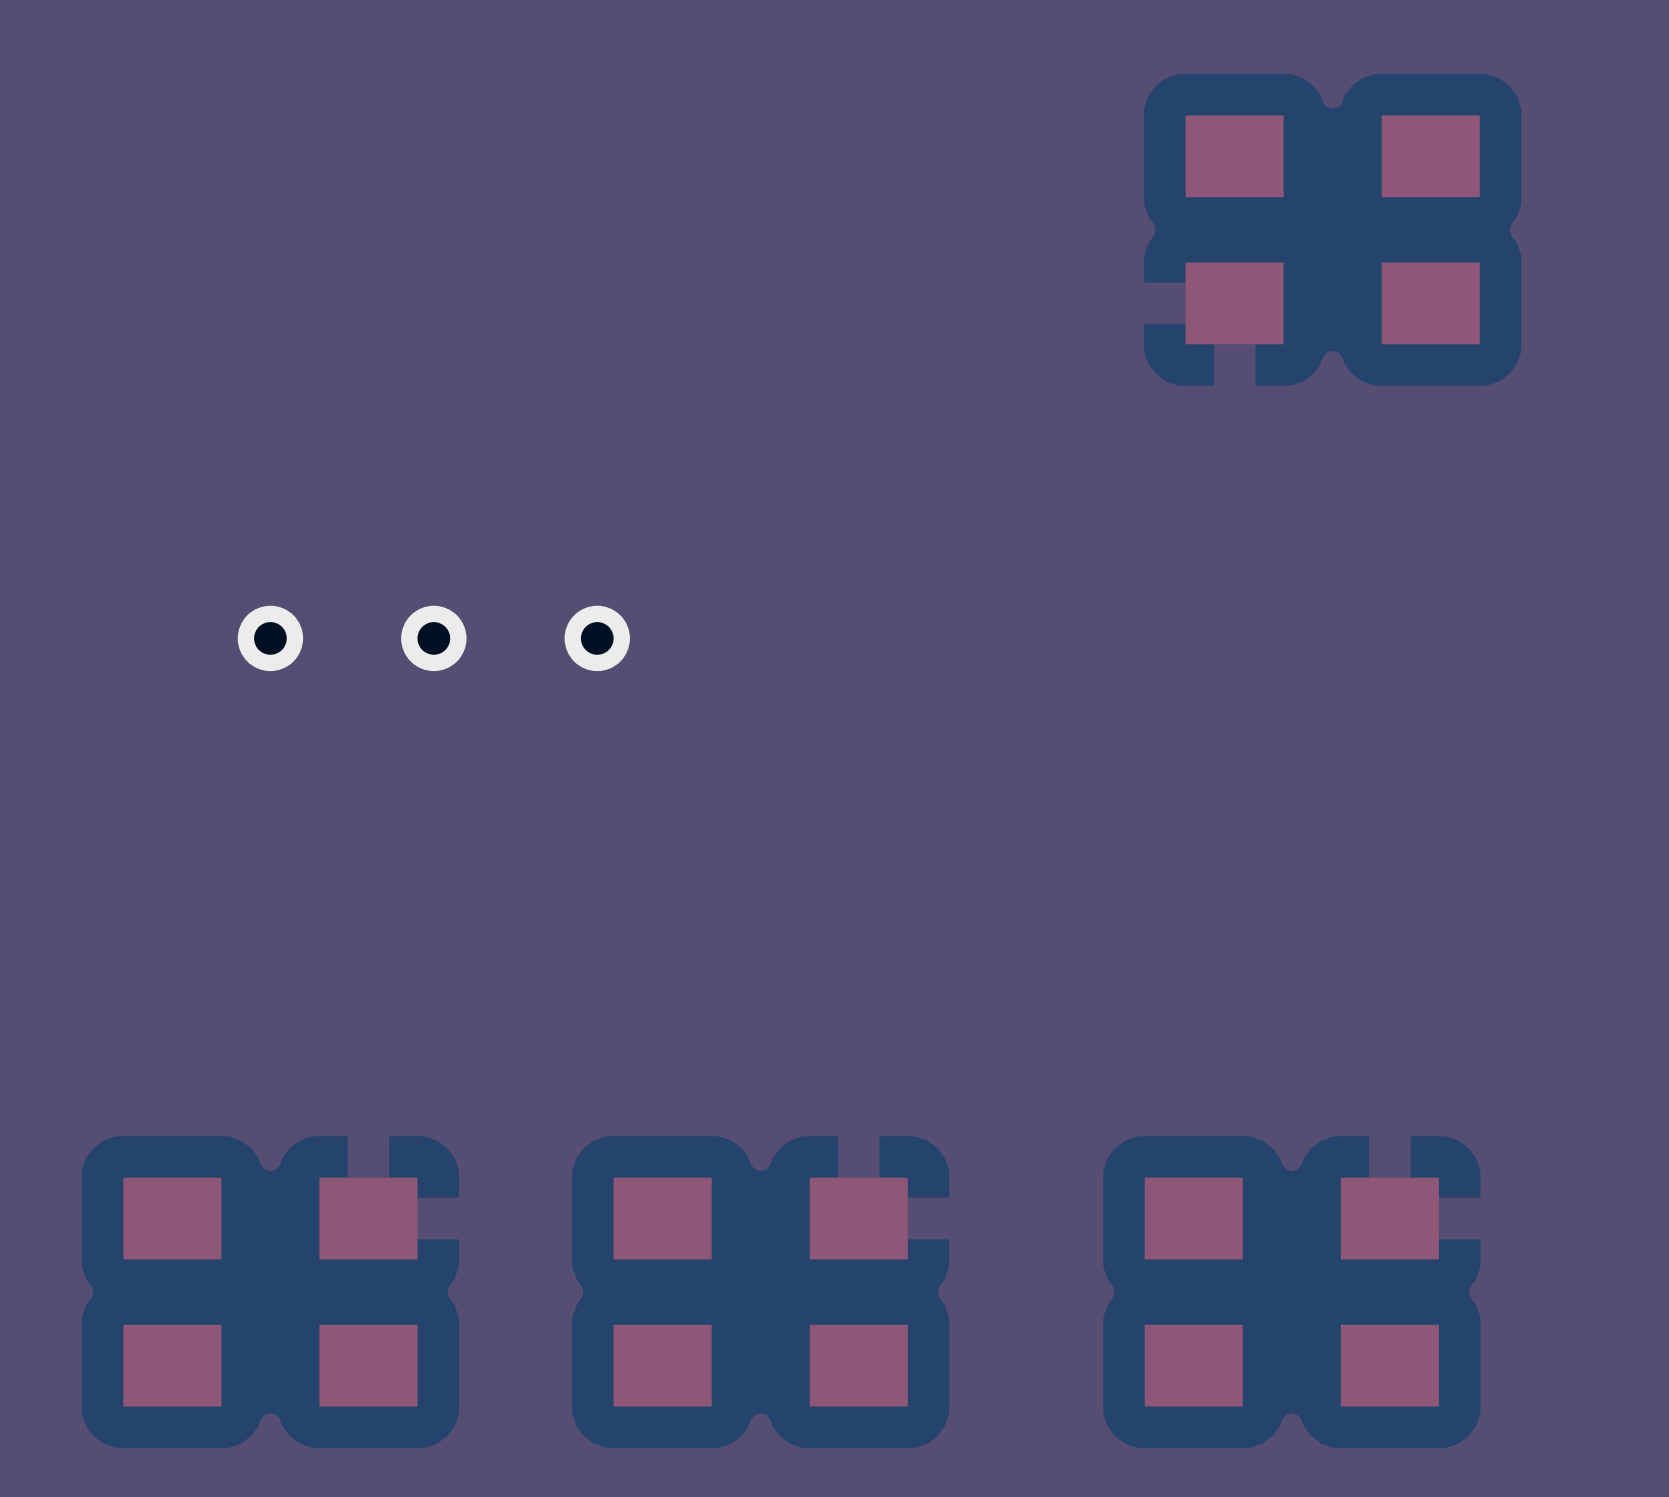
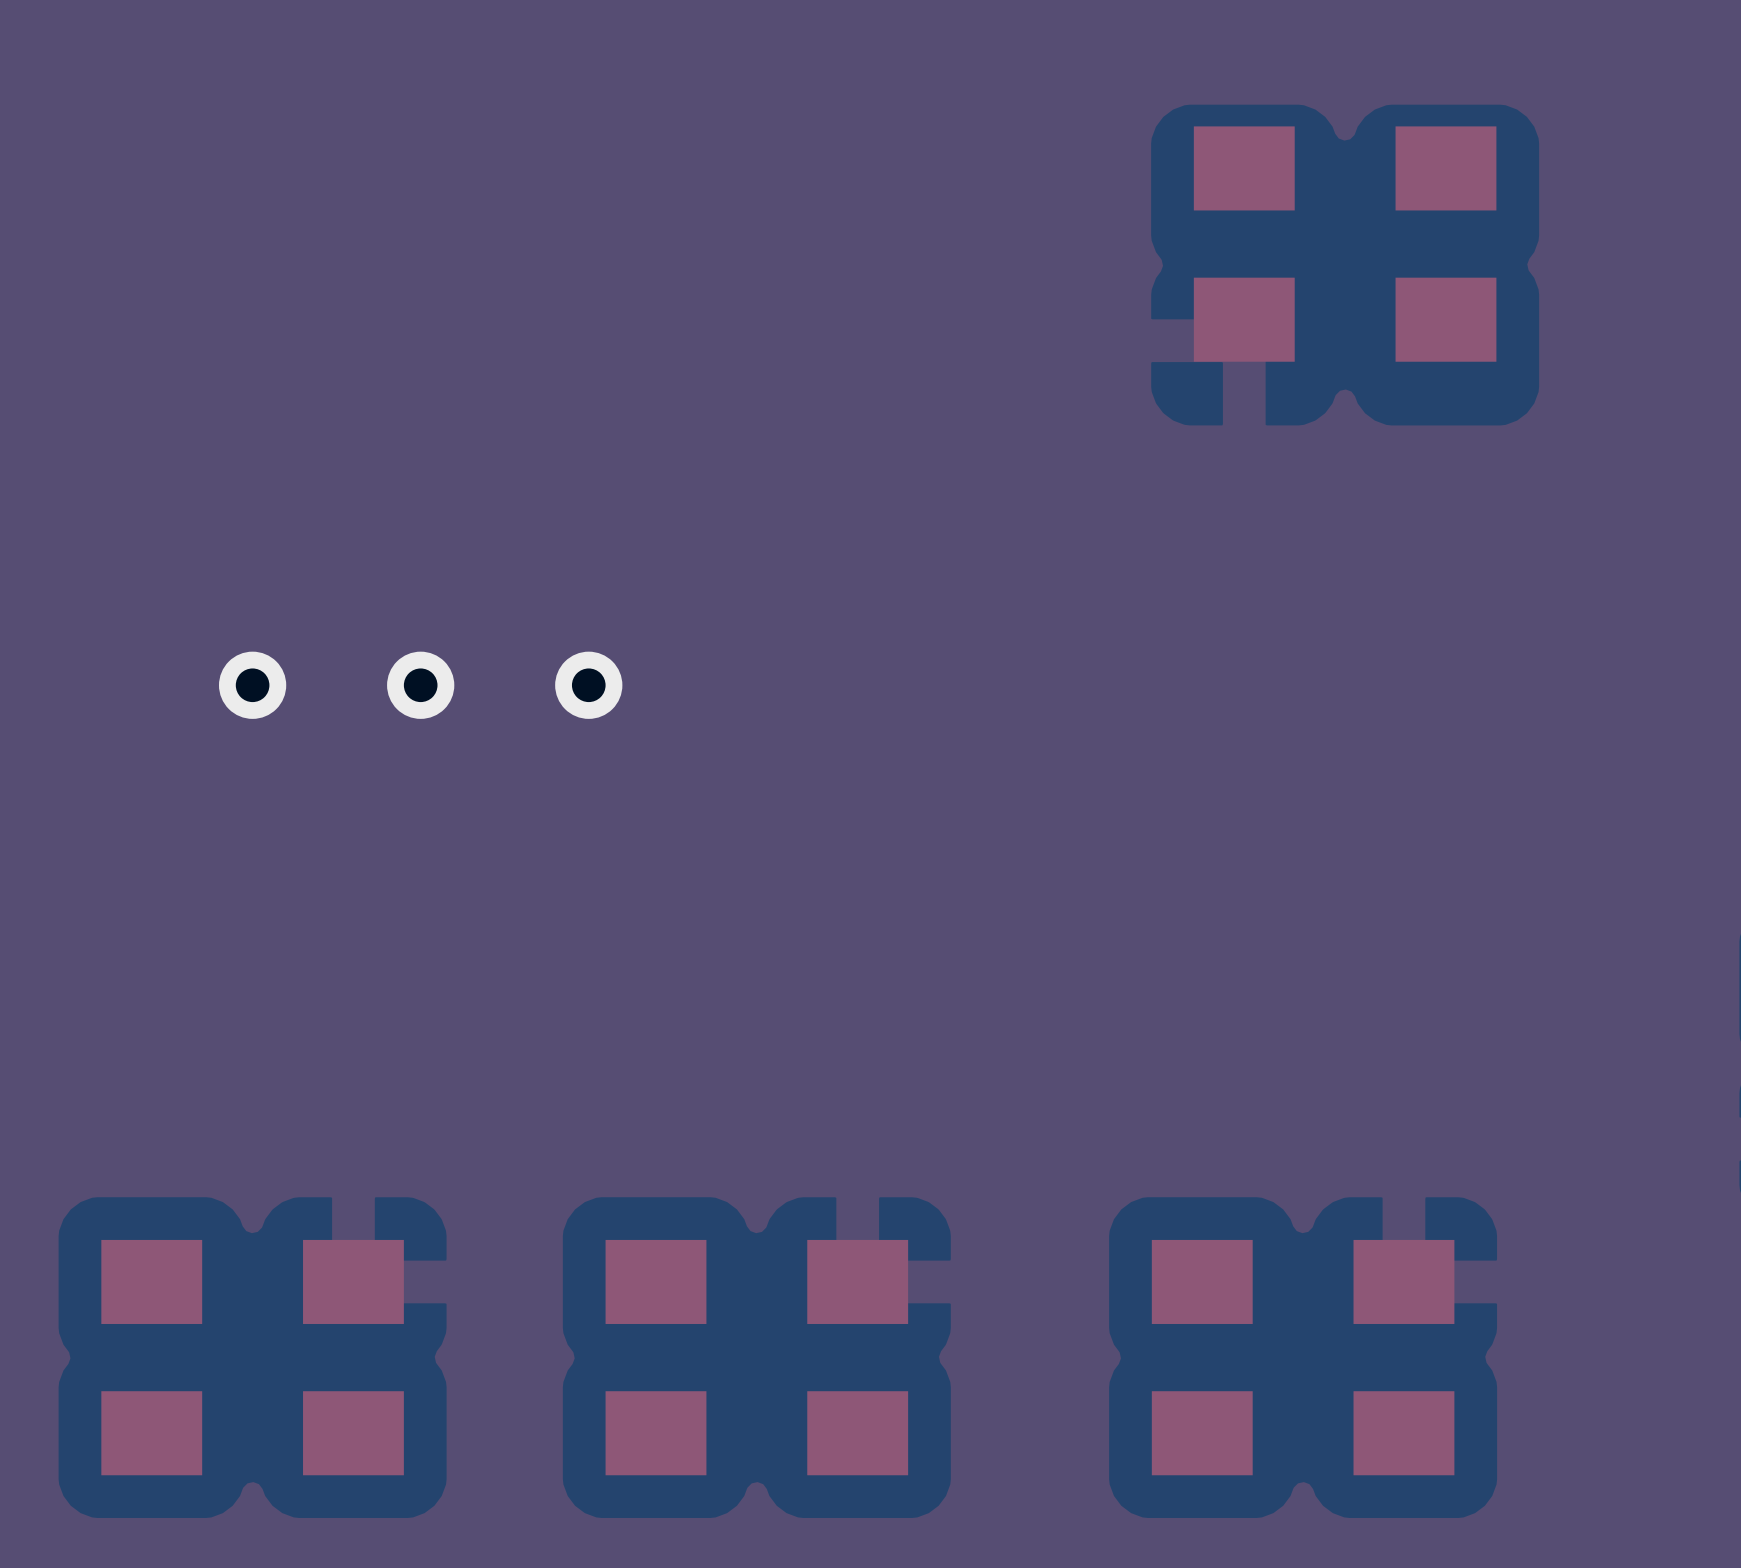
part position: (1332, 229) -> (1345, 244)

